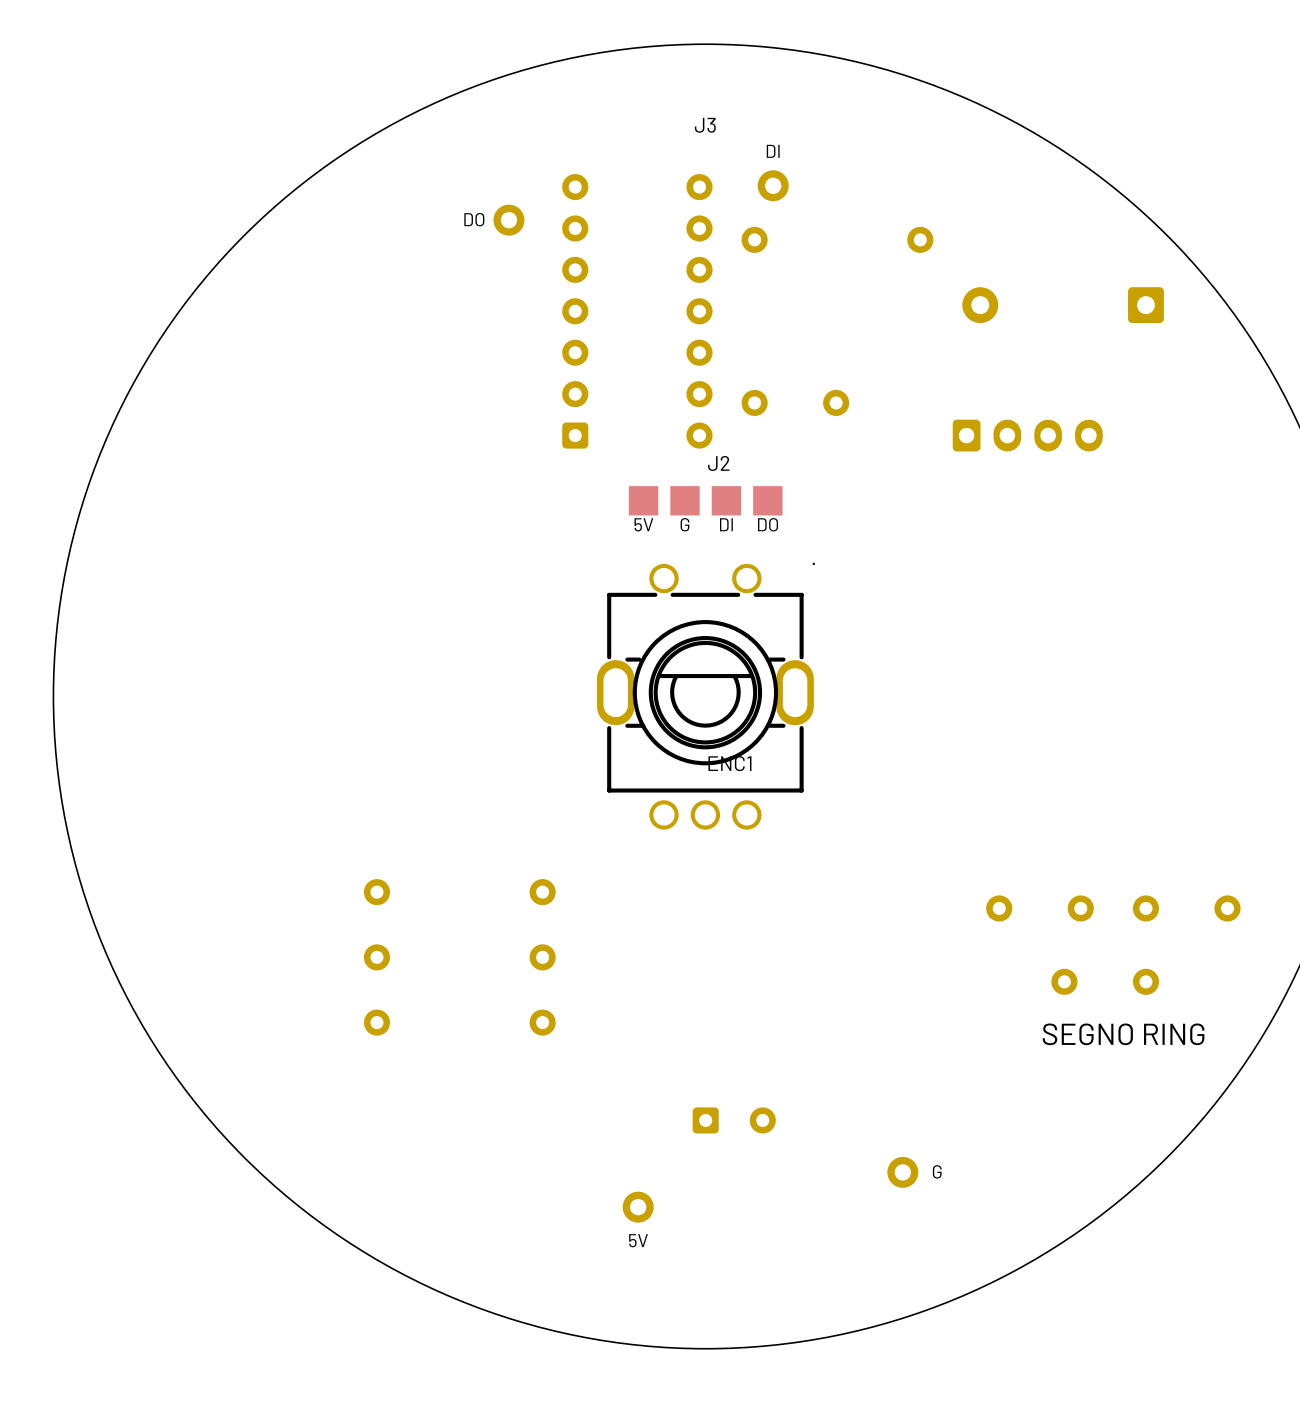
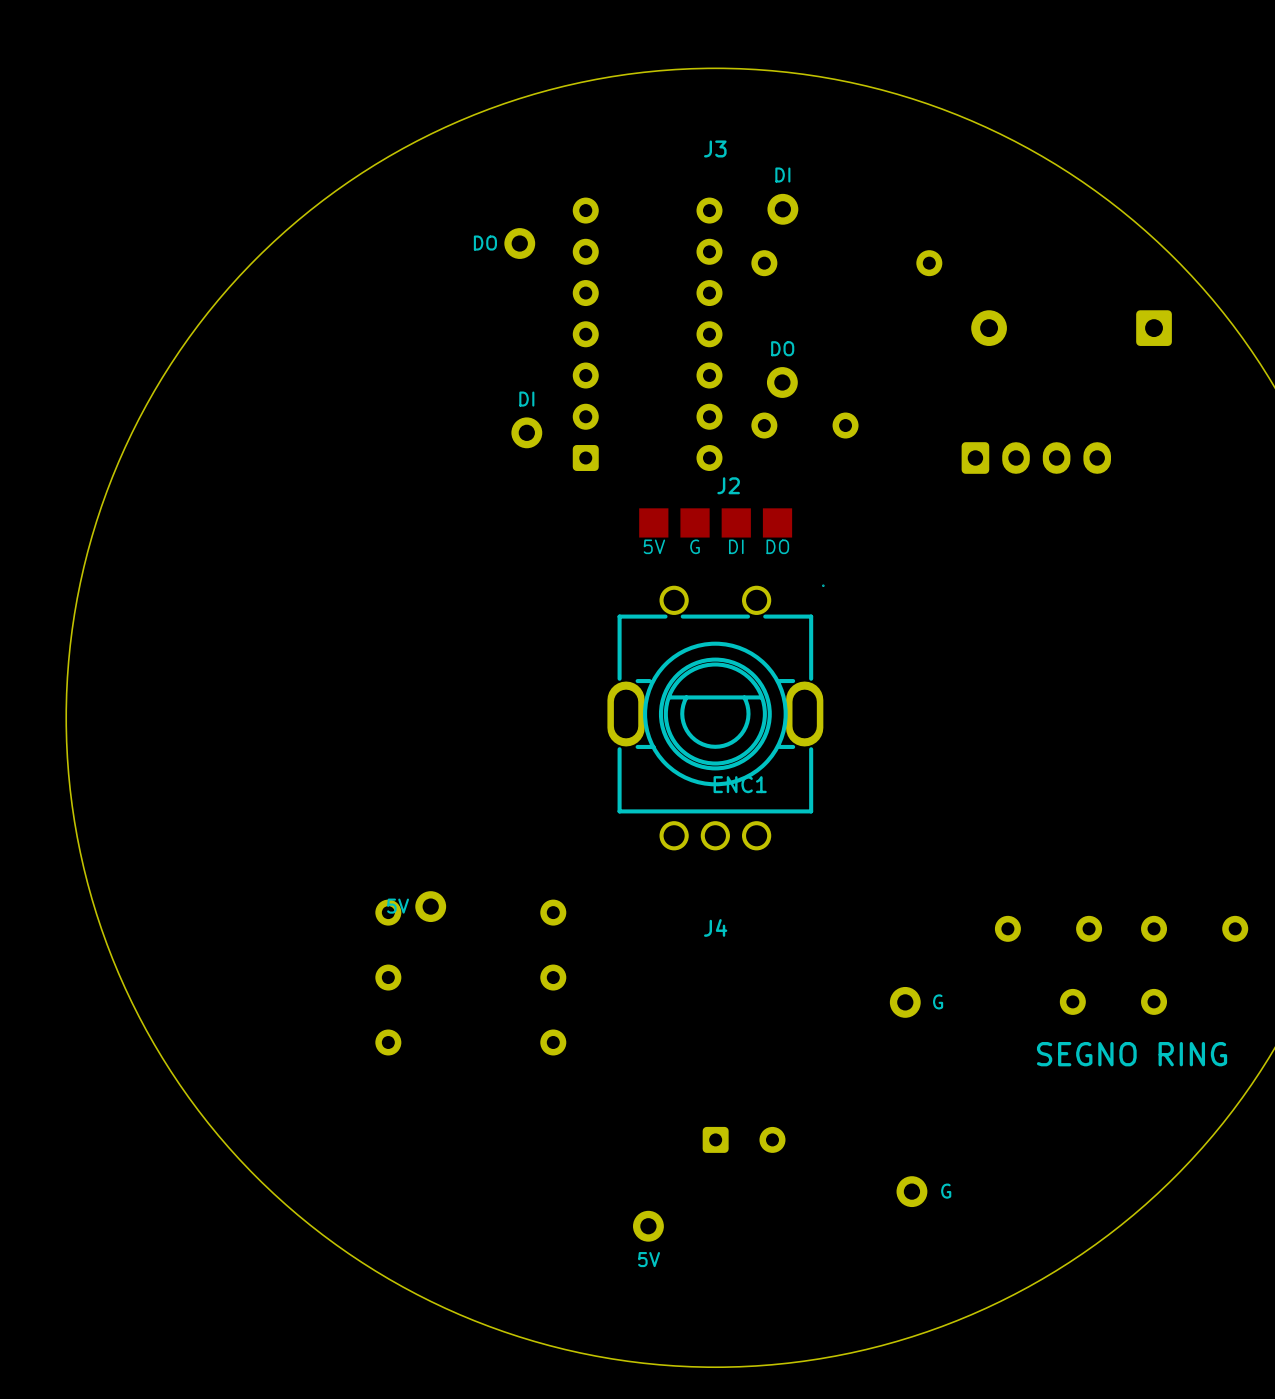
J4: none -> (668, 692)

